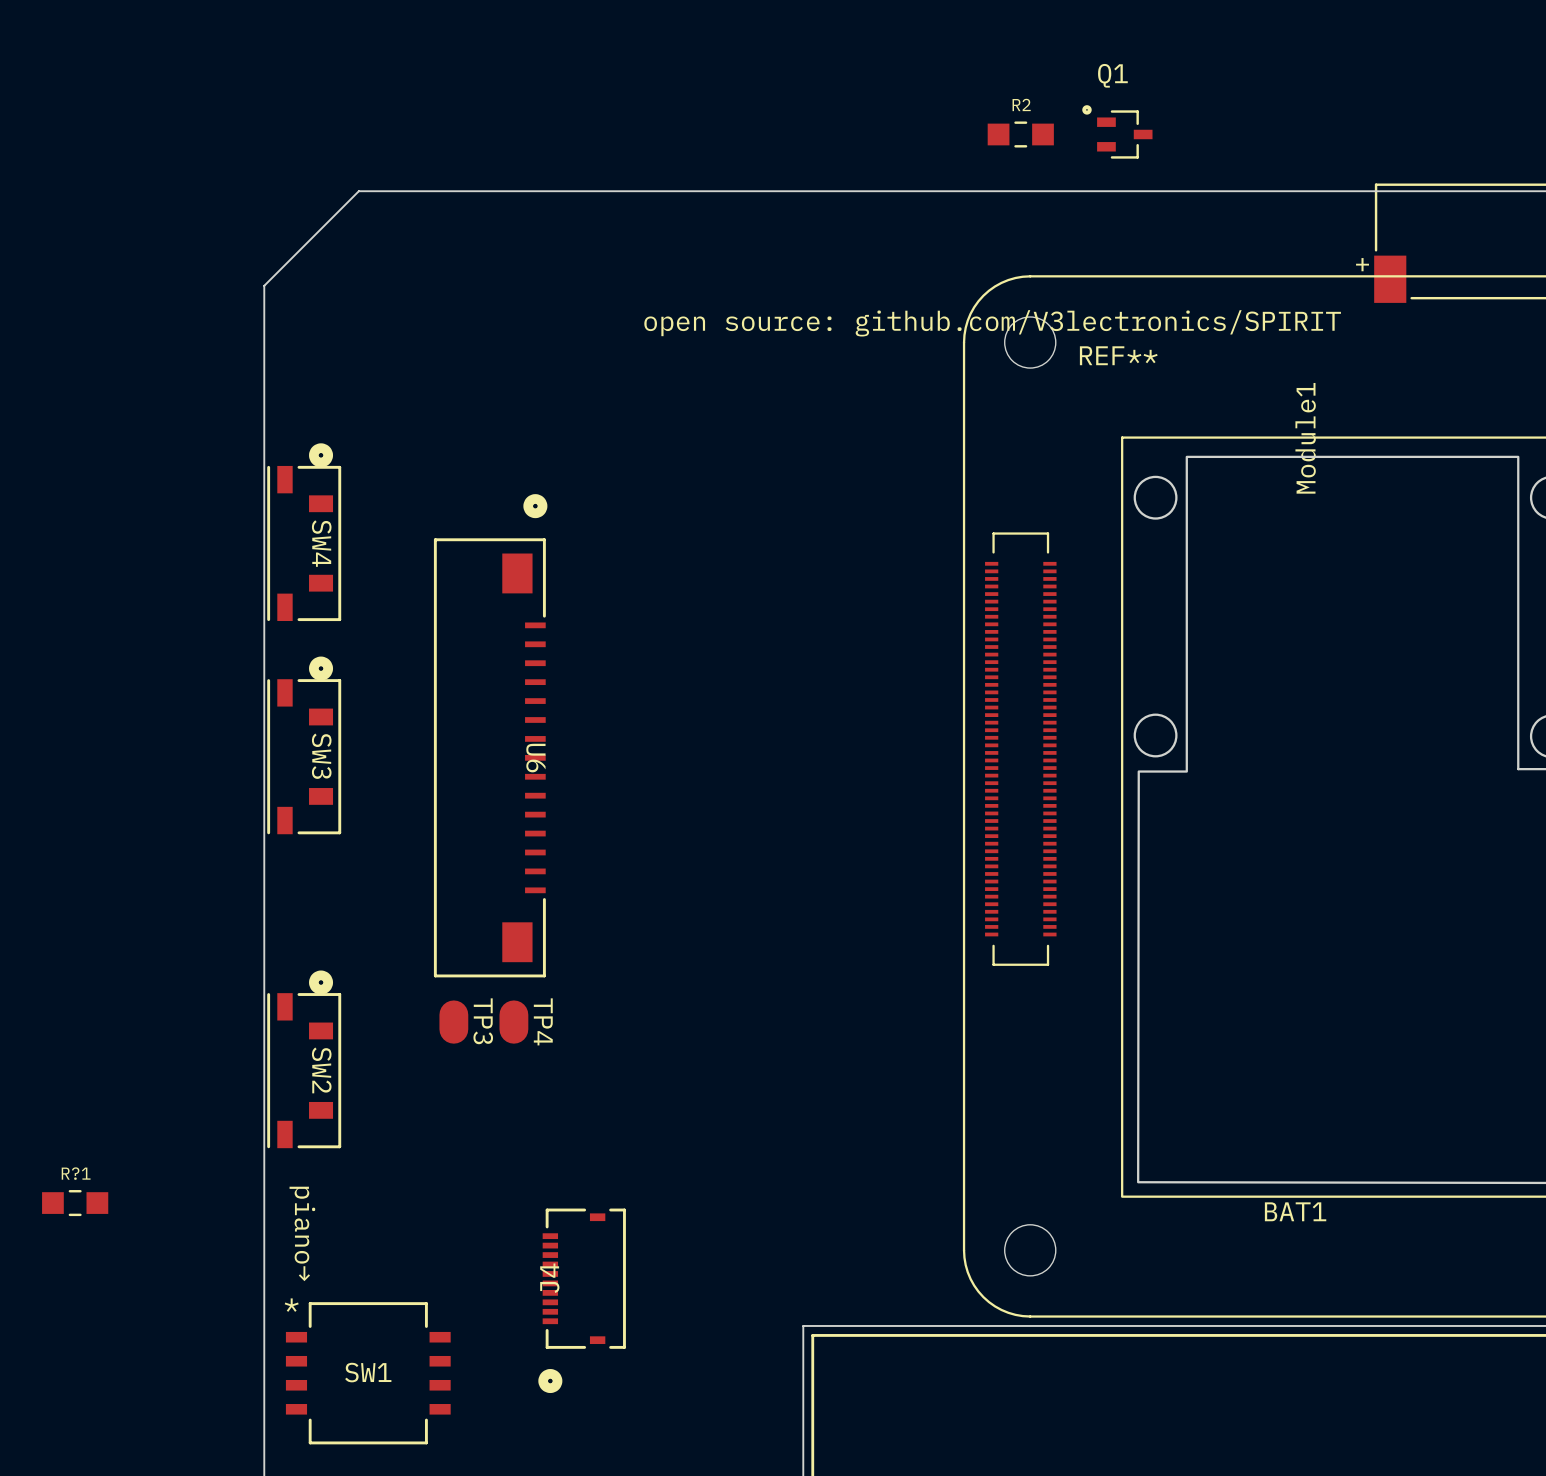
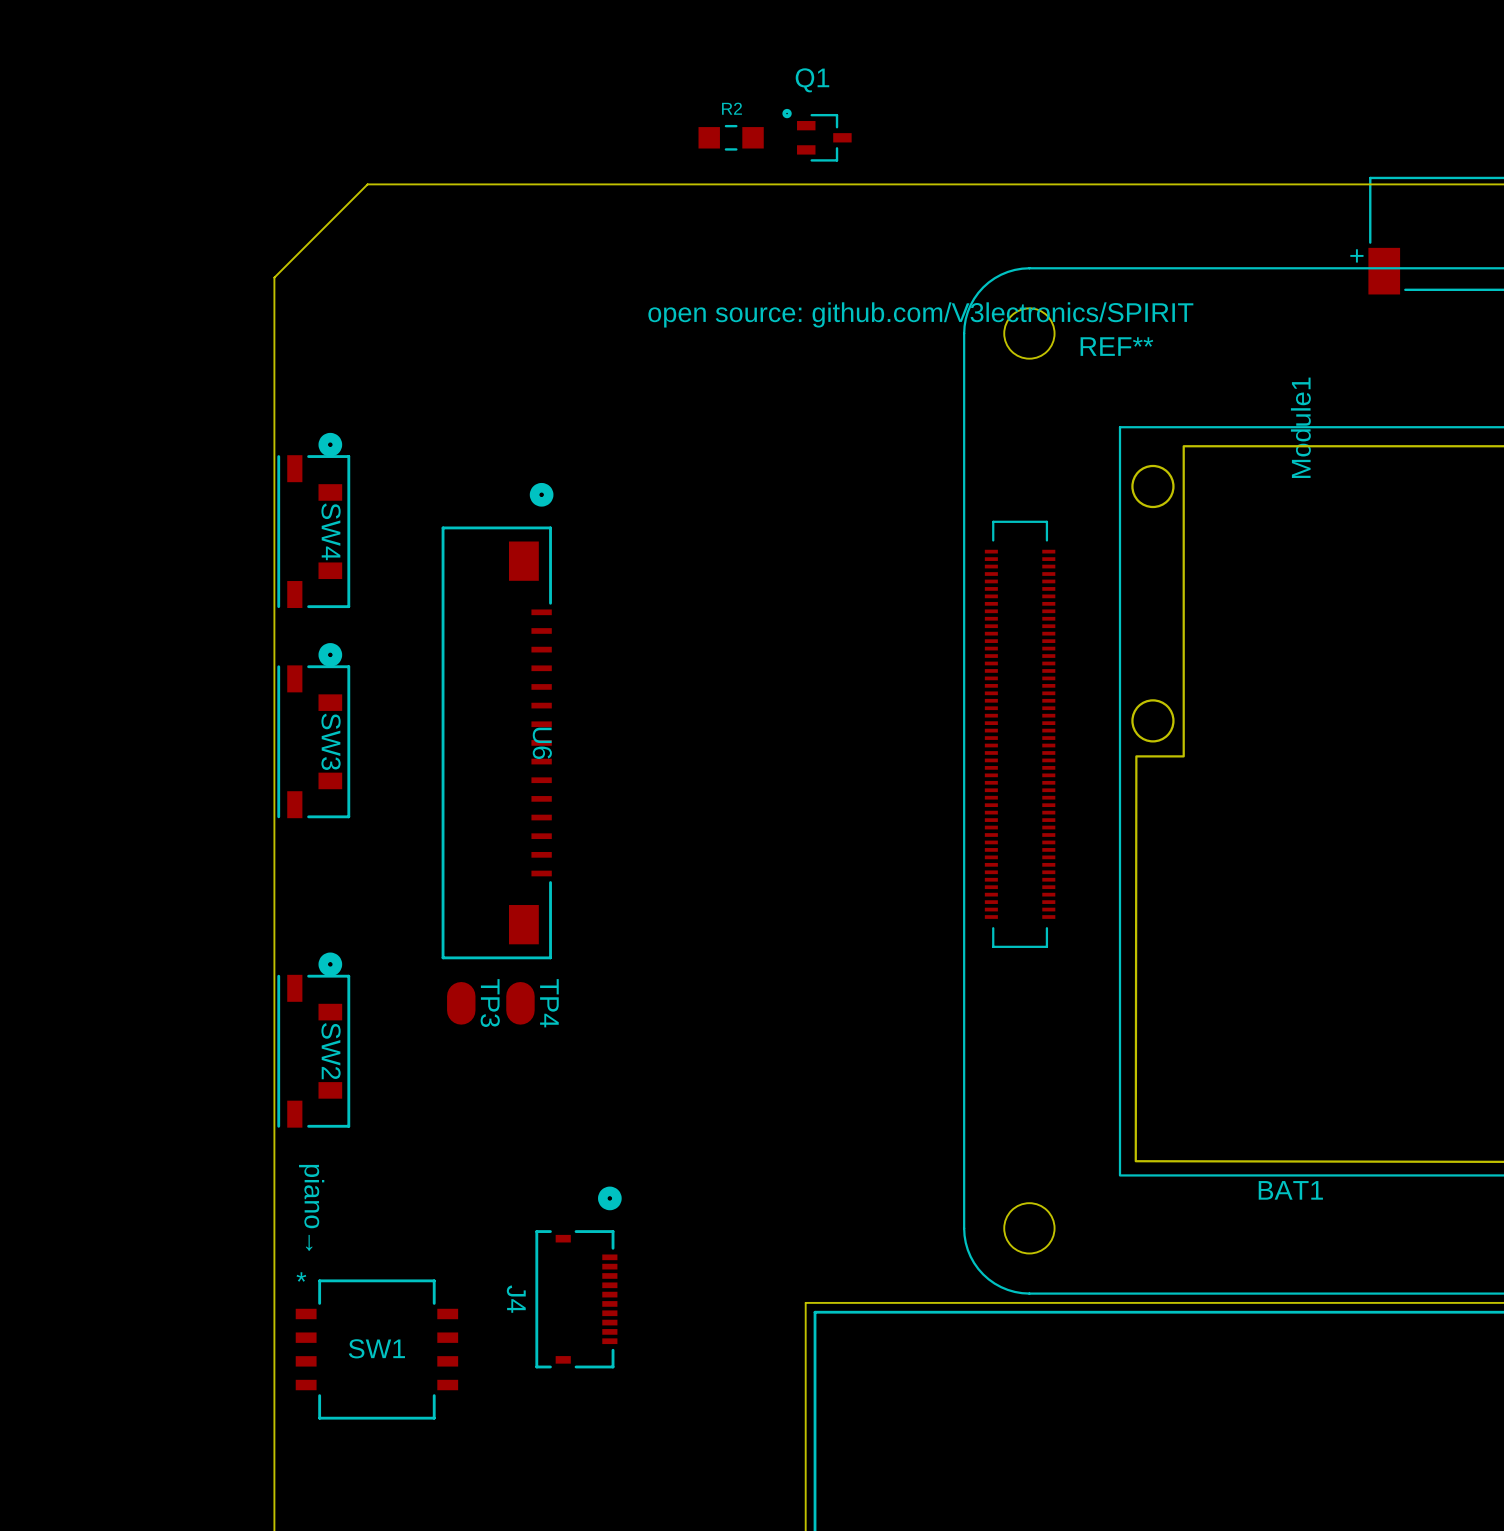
Q1 position: (1117, 131) -> (817, 135)
R2 position: (1020, 134) -> (731, 137)
R?1: (75, 1203) -> none
J4 name position: J4 (549, 1278) -> J4 (516, 1299)
J4 rotation: 0° (582, 1300) -> 180° (578, 1277)

